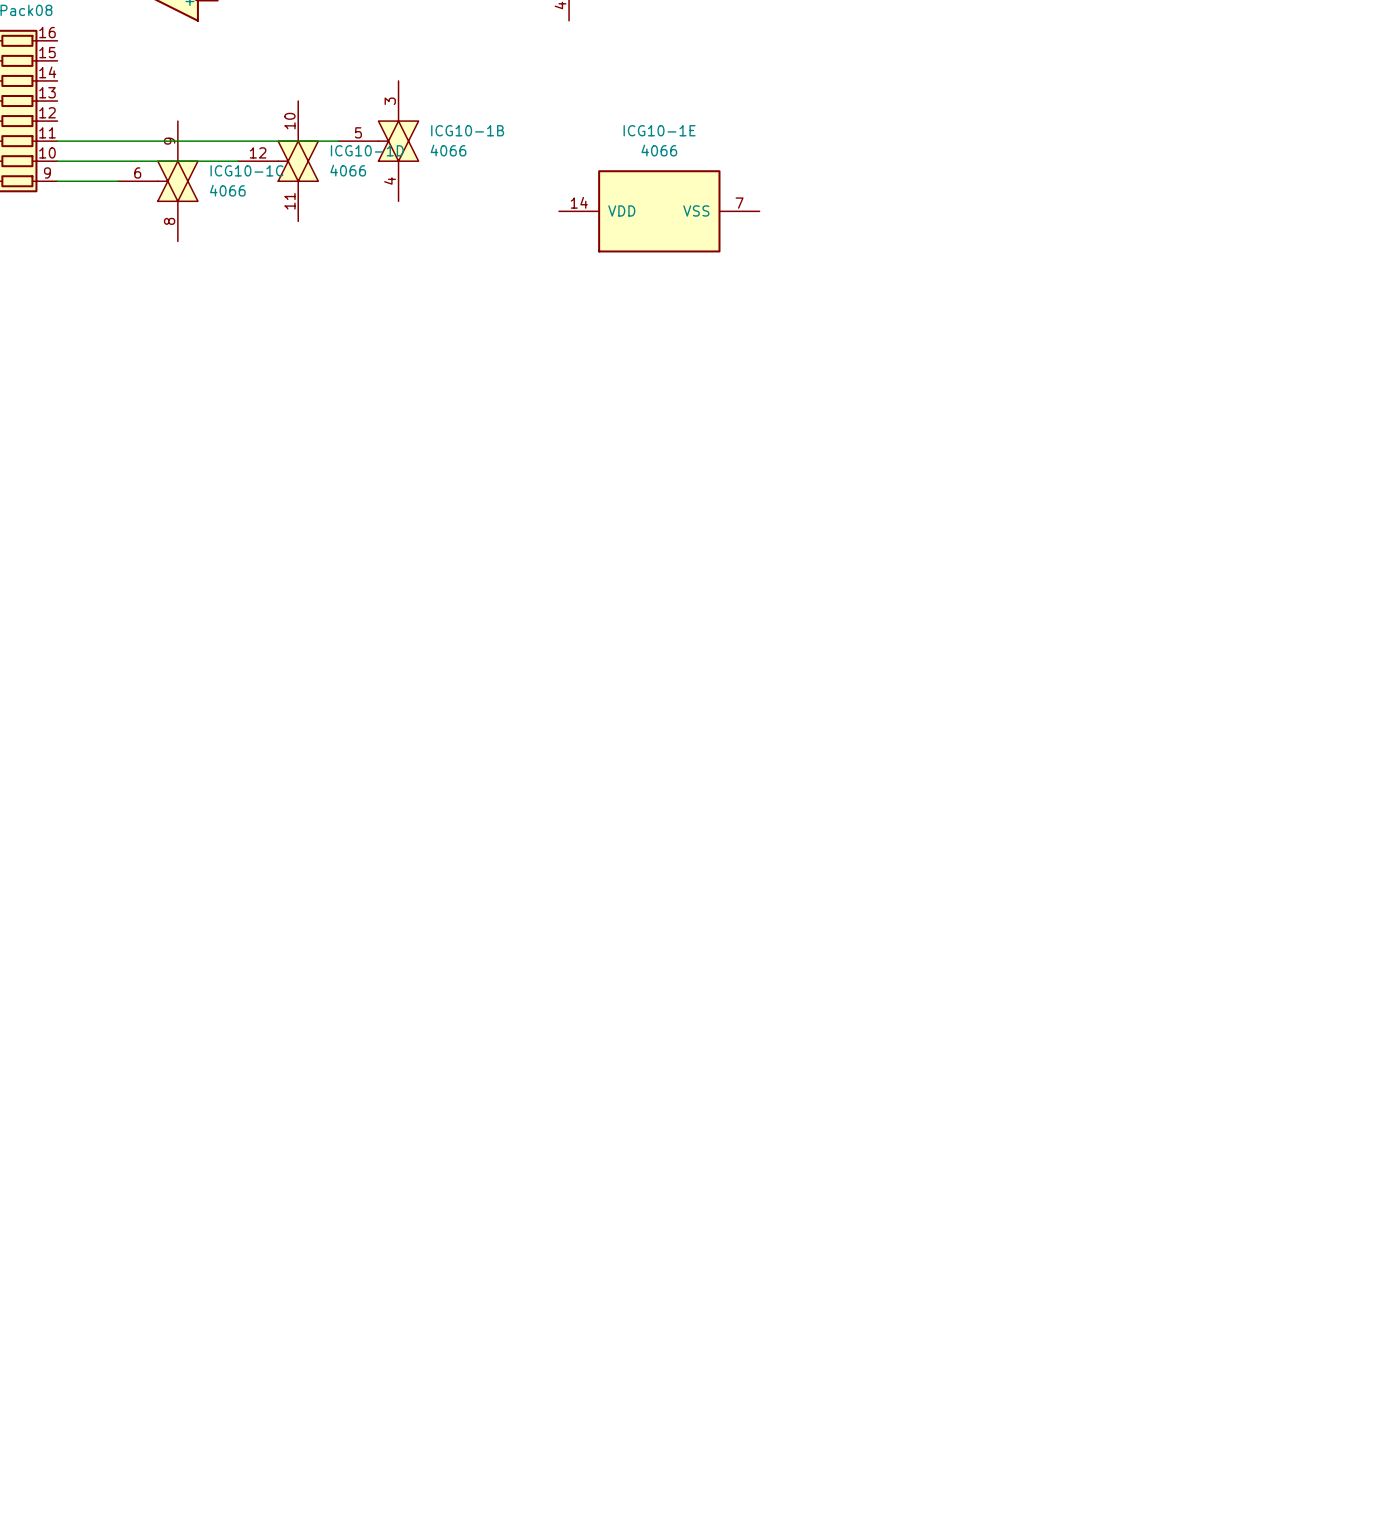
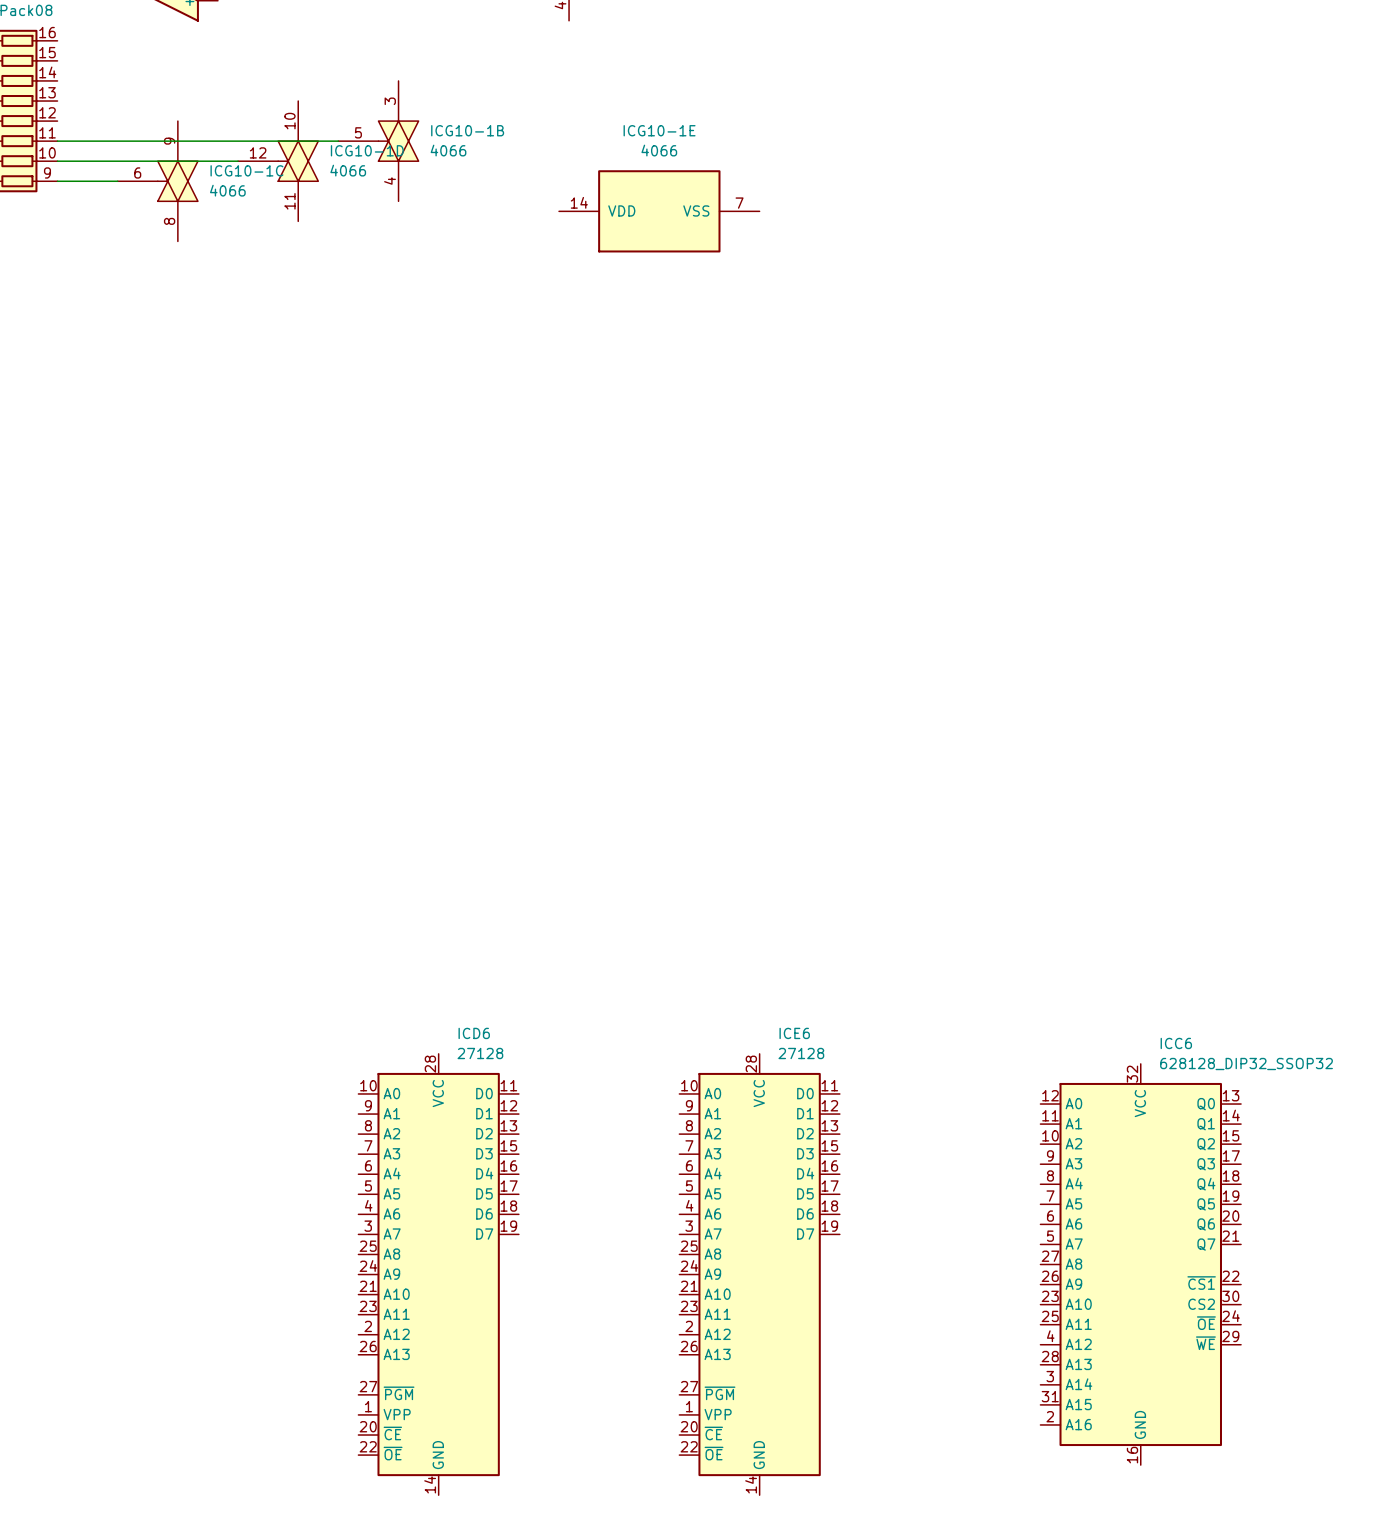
ICC6: none -> 628128_DIP32_SSOP32 (1140, 1264)
ICD6: none -> 27128 (438, 1274)
ICE6: none -> 27128 (759, 1274)

